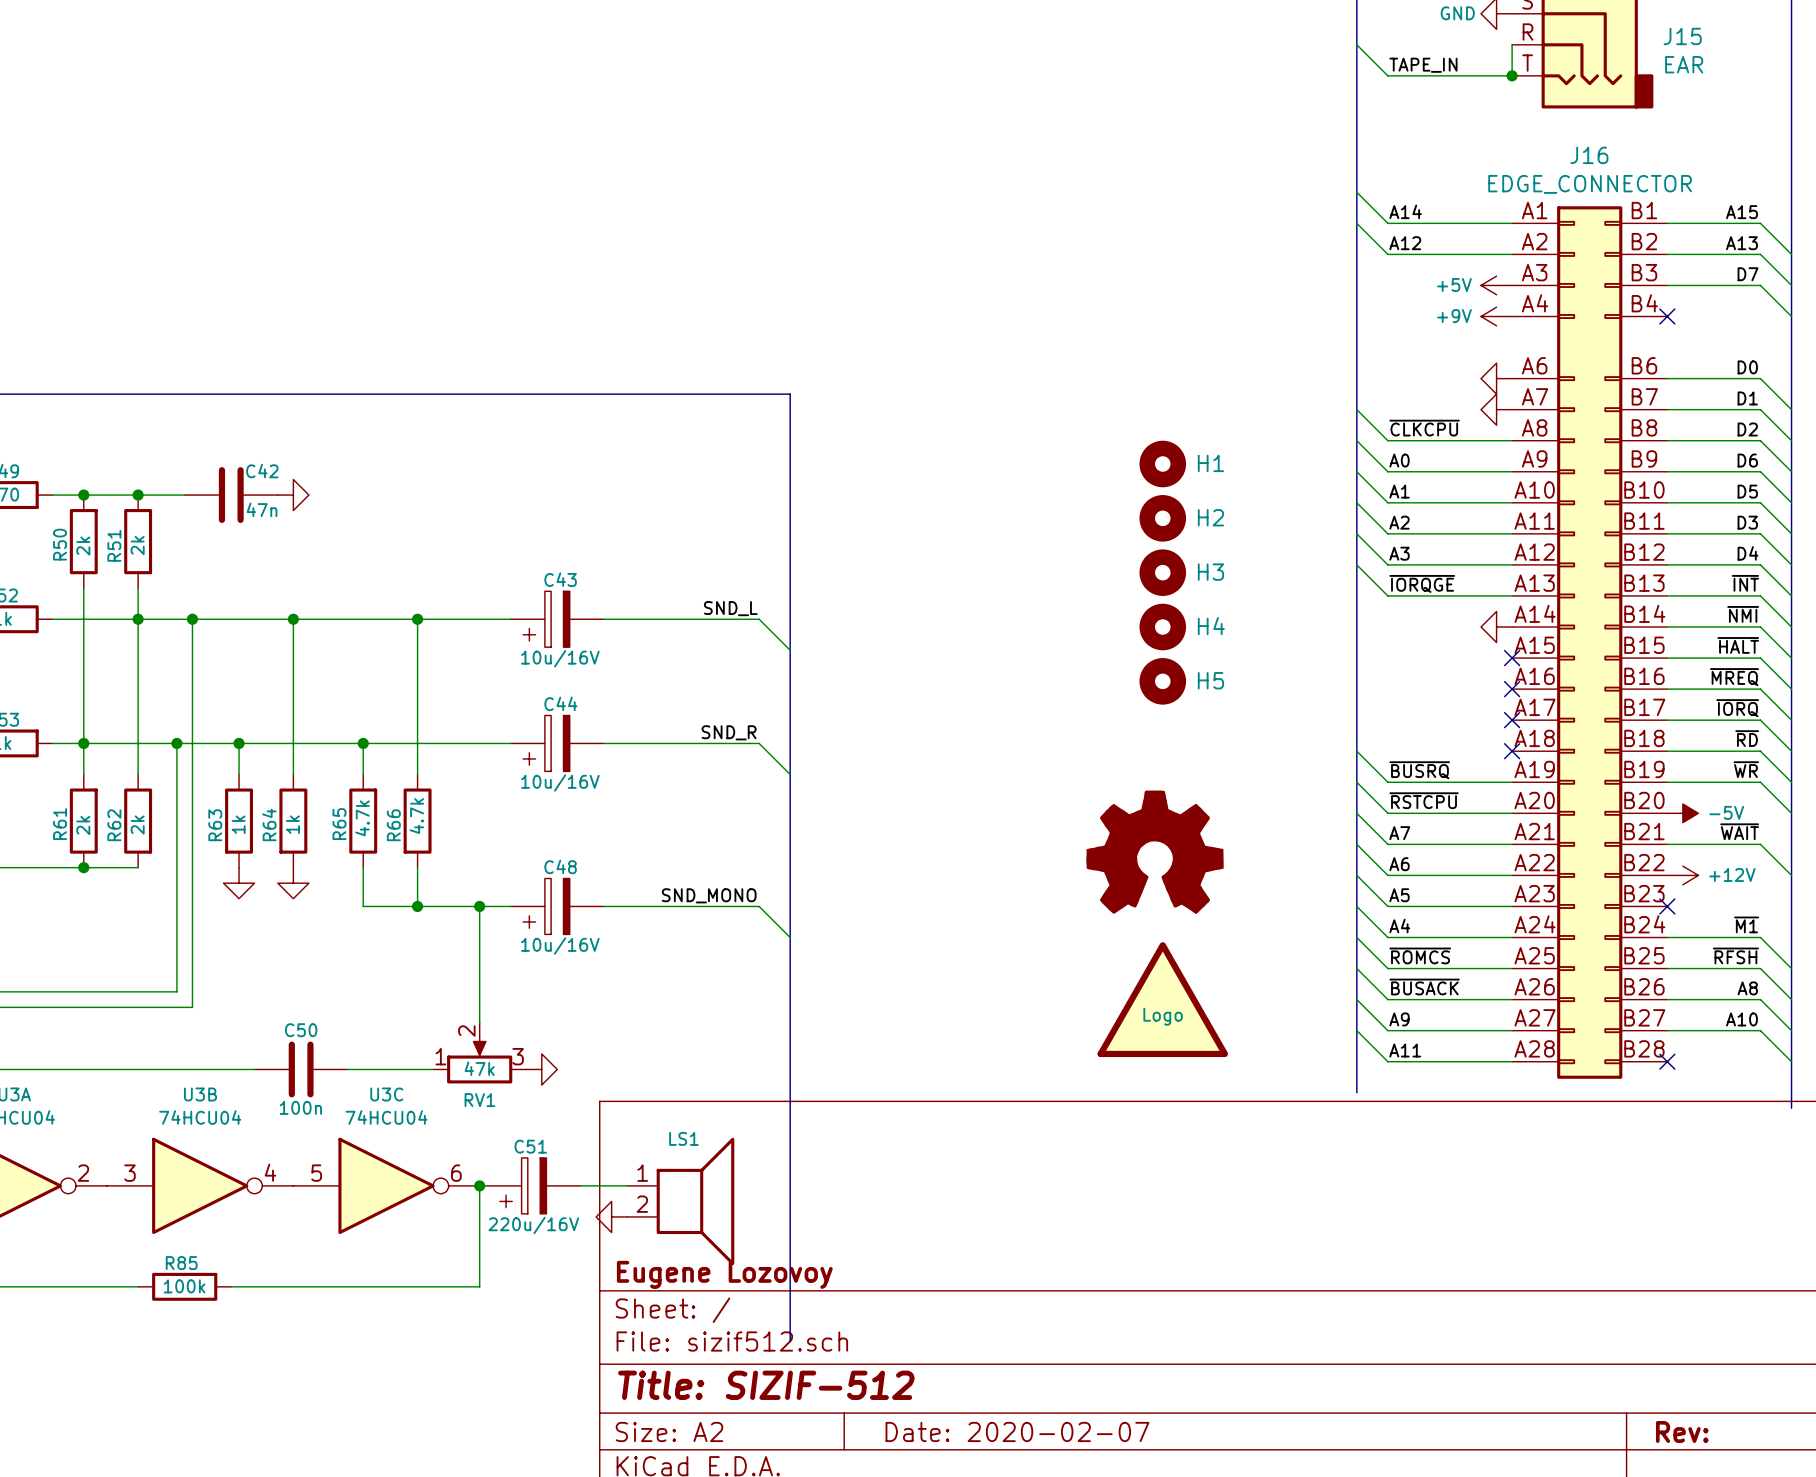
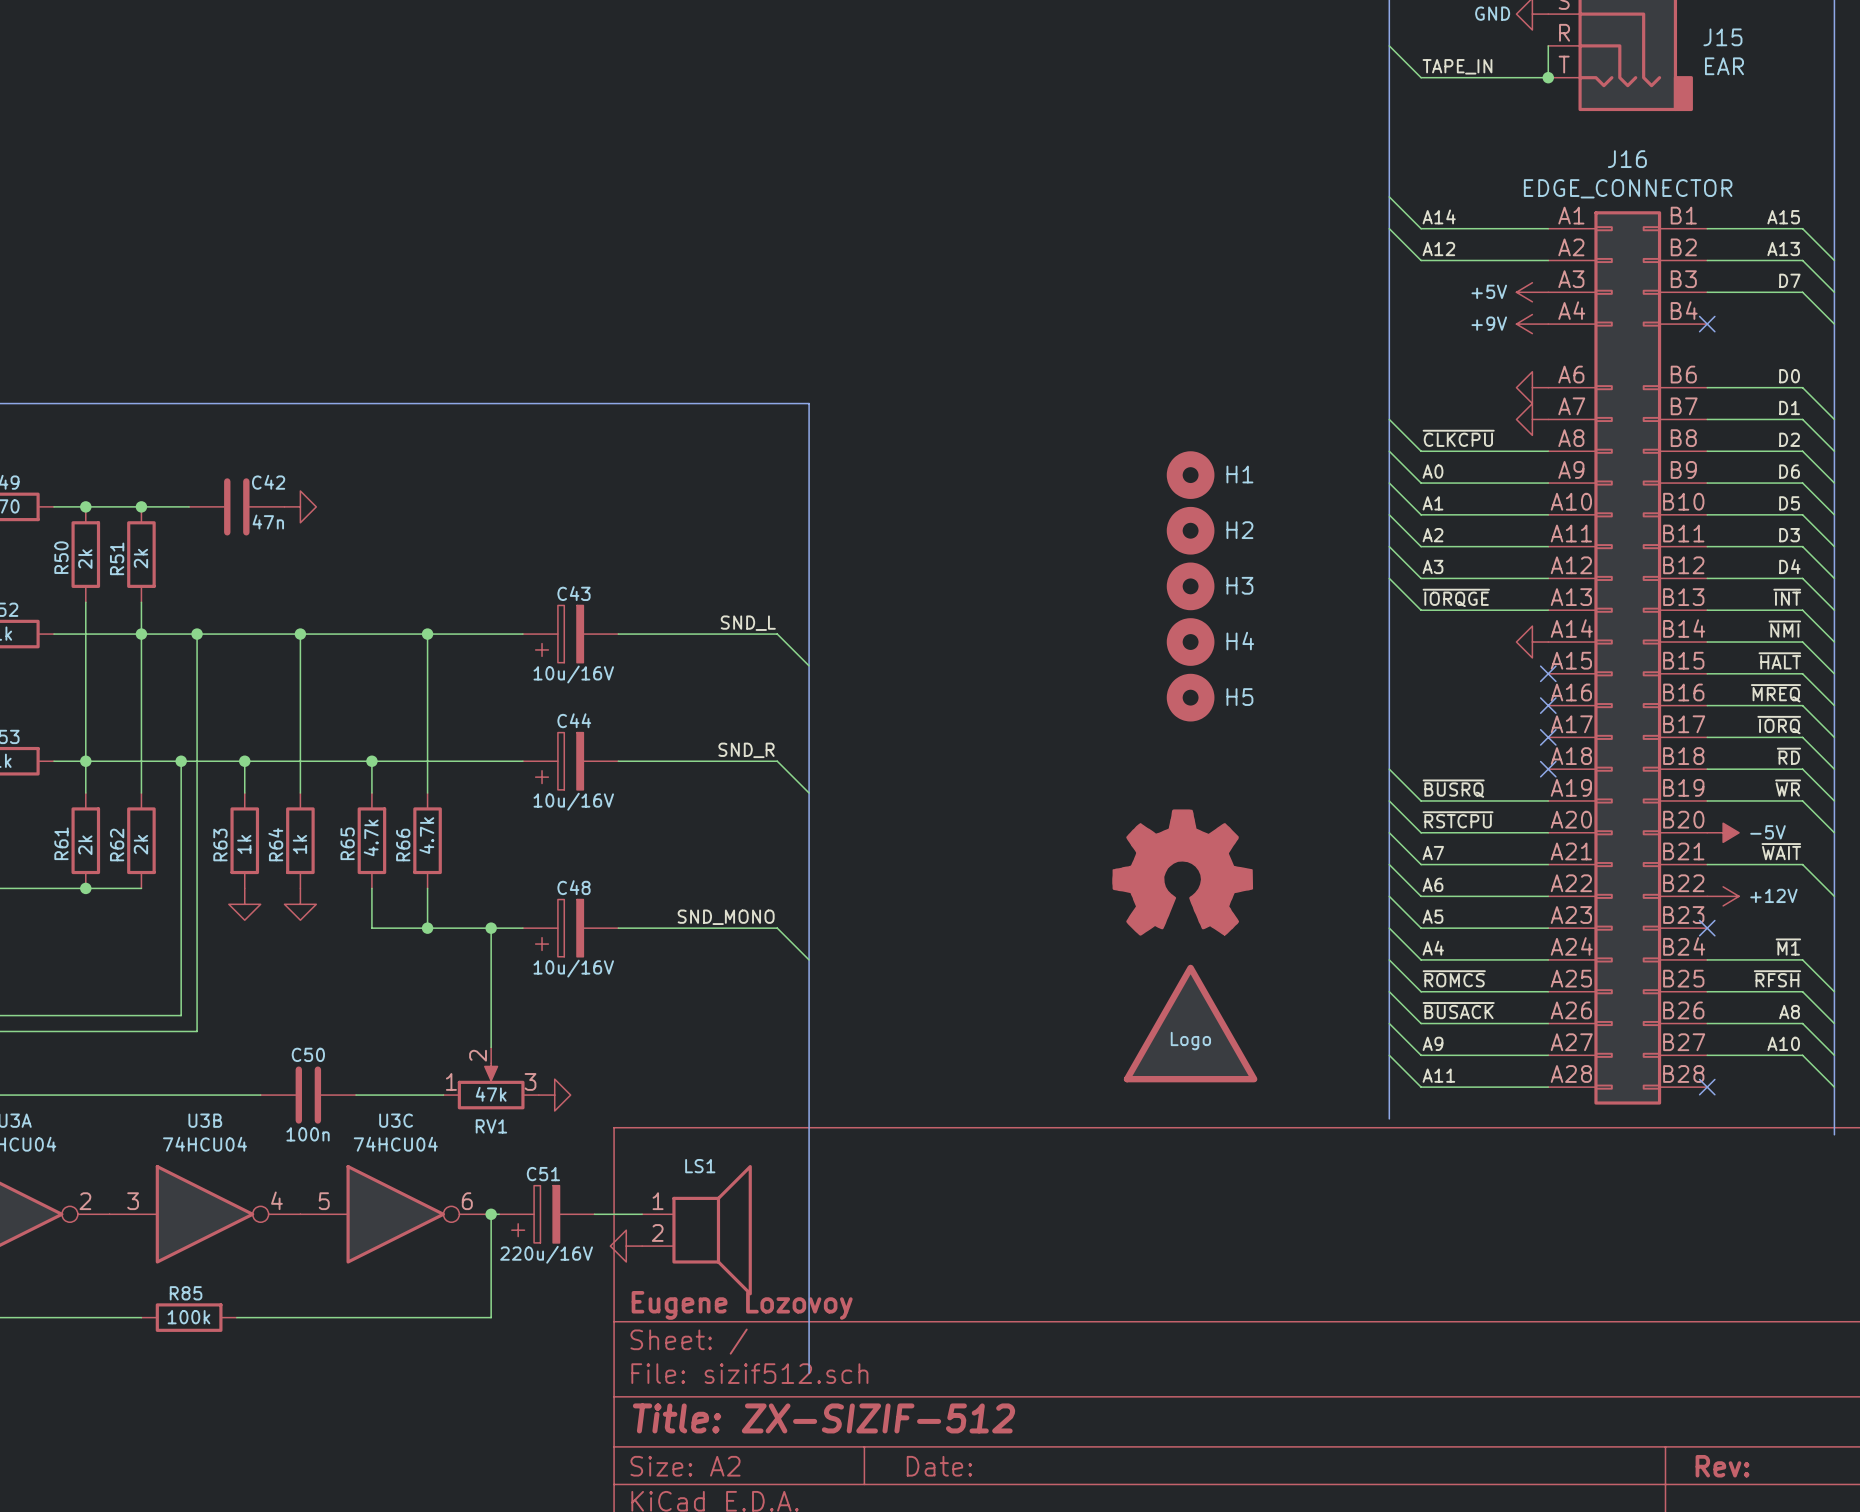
title block: Title: SIZIF-512 (766, 1385) -> Title: ZX-SIZIF-512 (824, 1418)
title block: Date: 2020-02-07 (1017, 1431) -> Date: (939, 1466)

